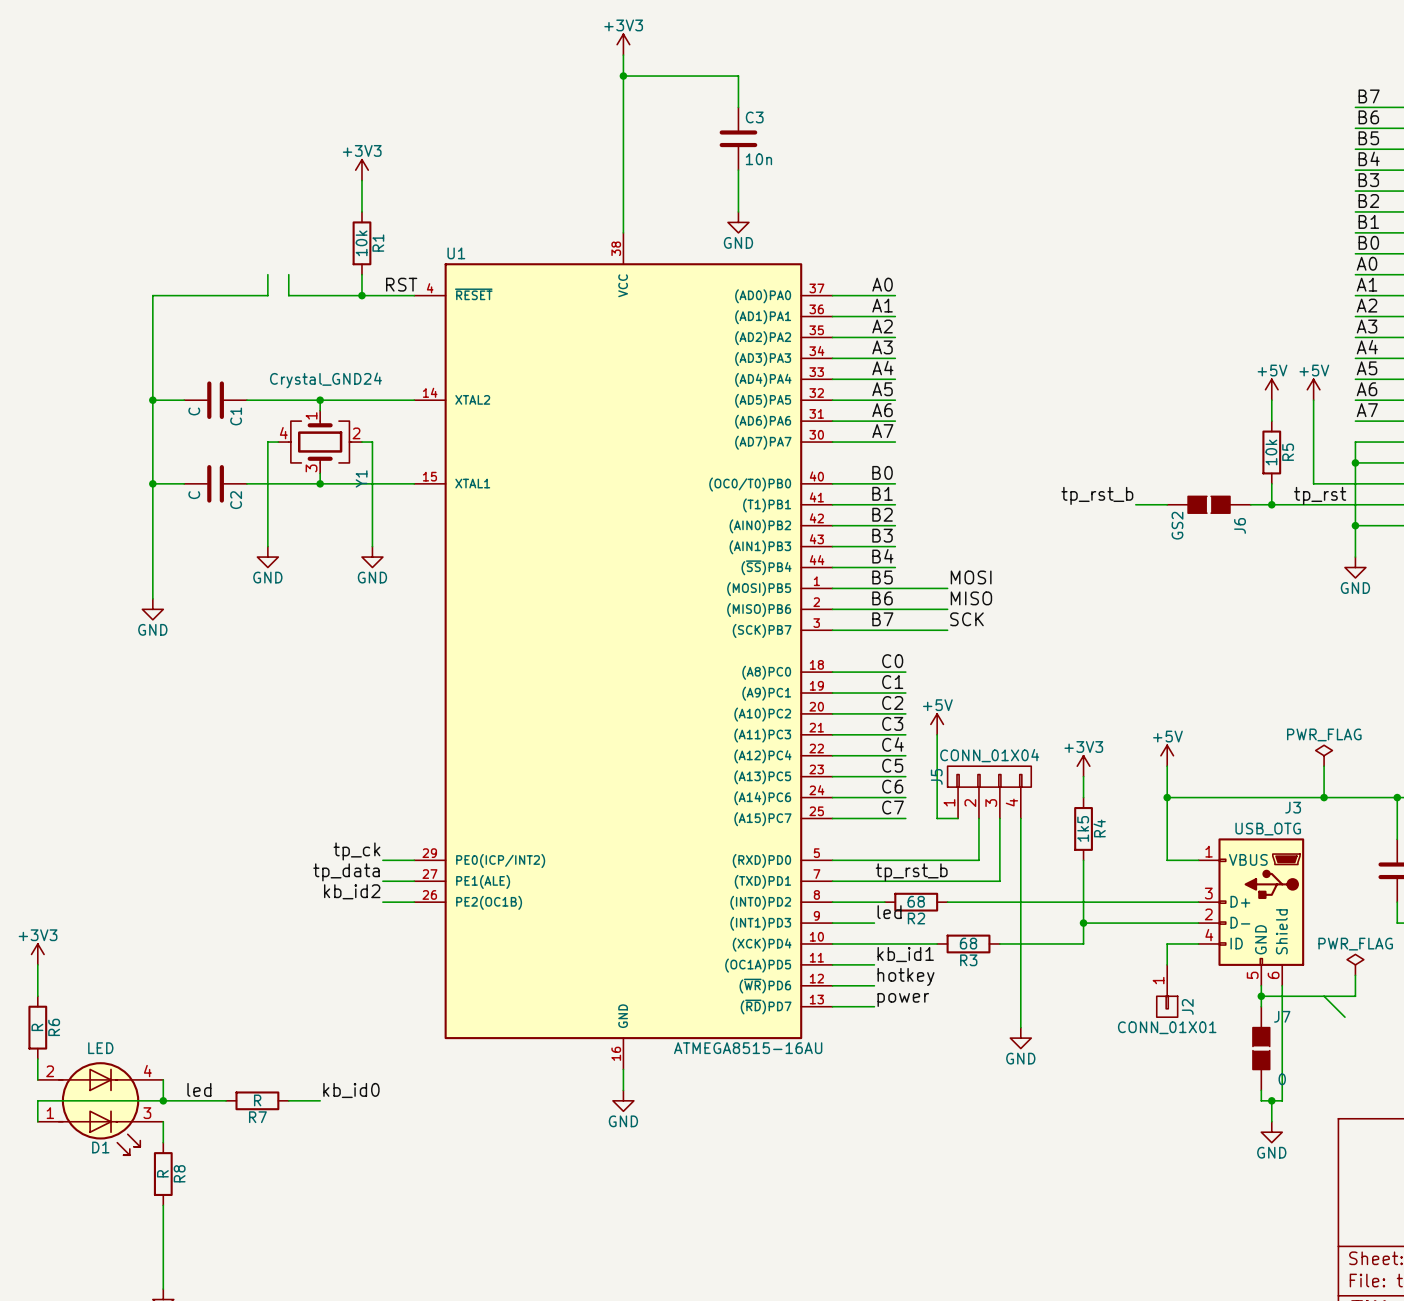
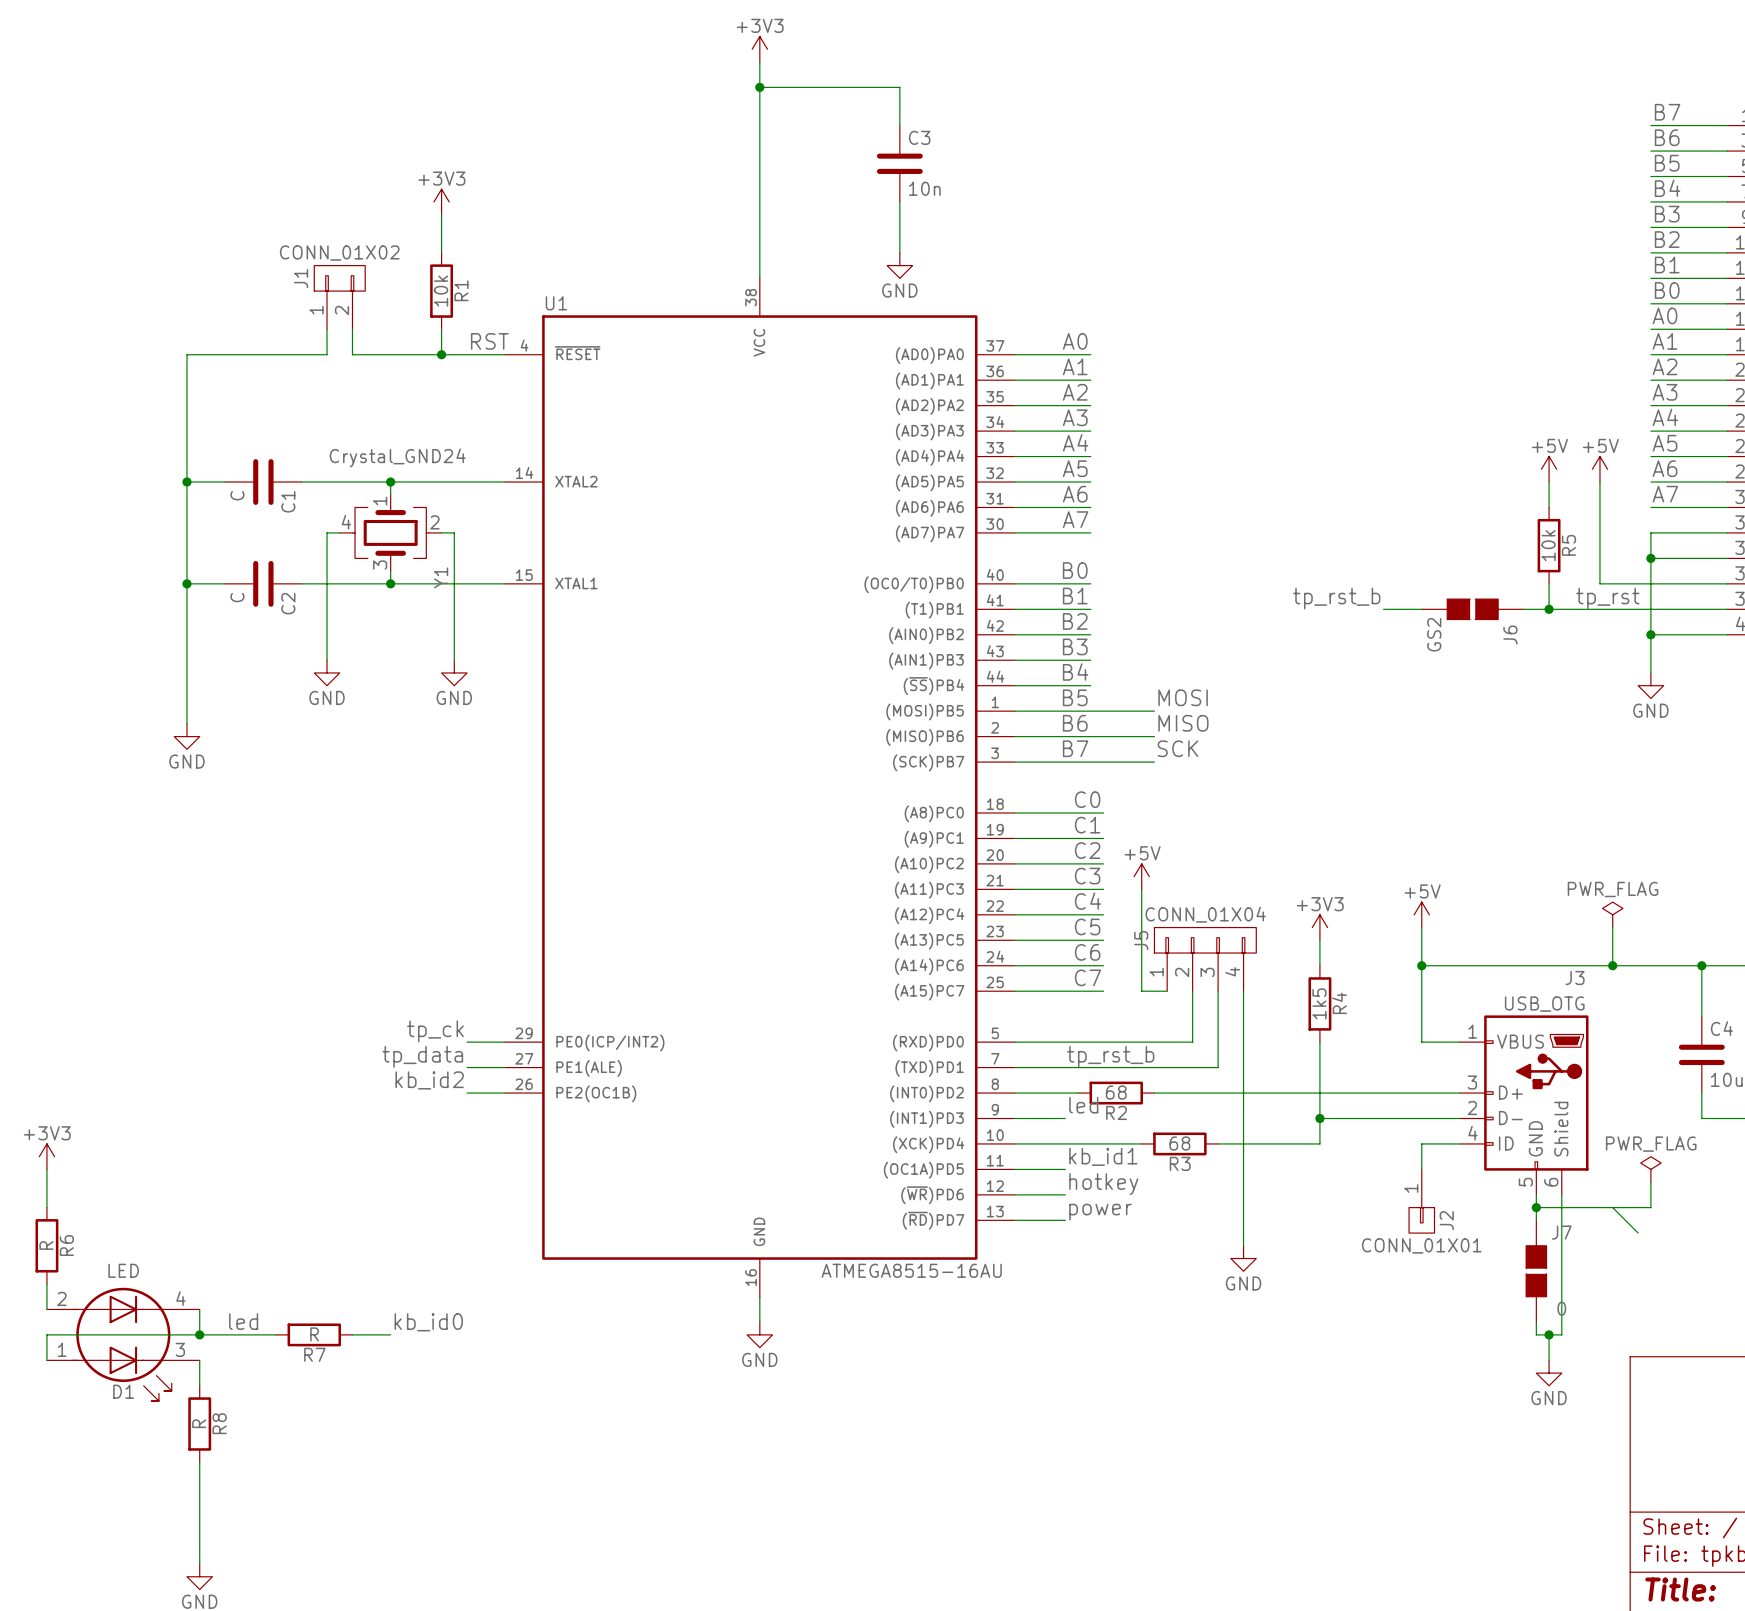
J1: none -> CONN_01X02 (339, 297)

